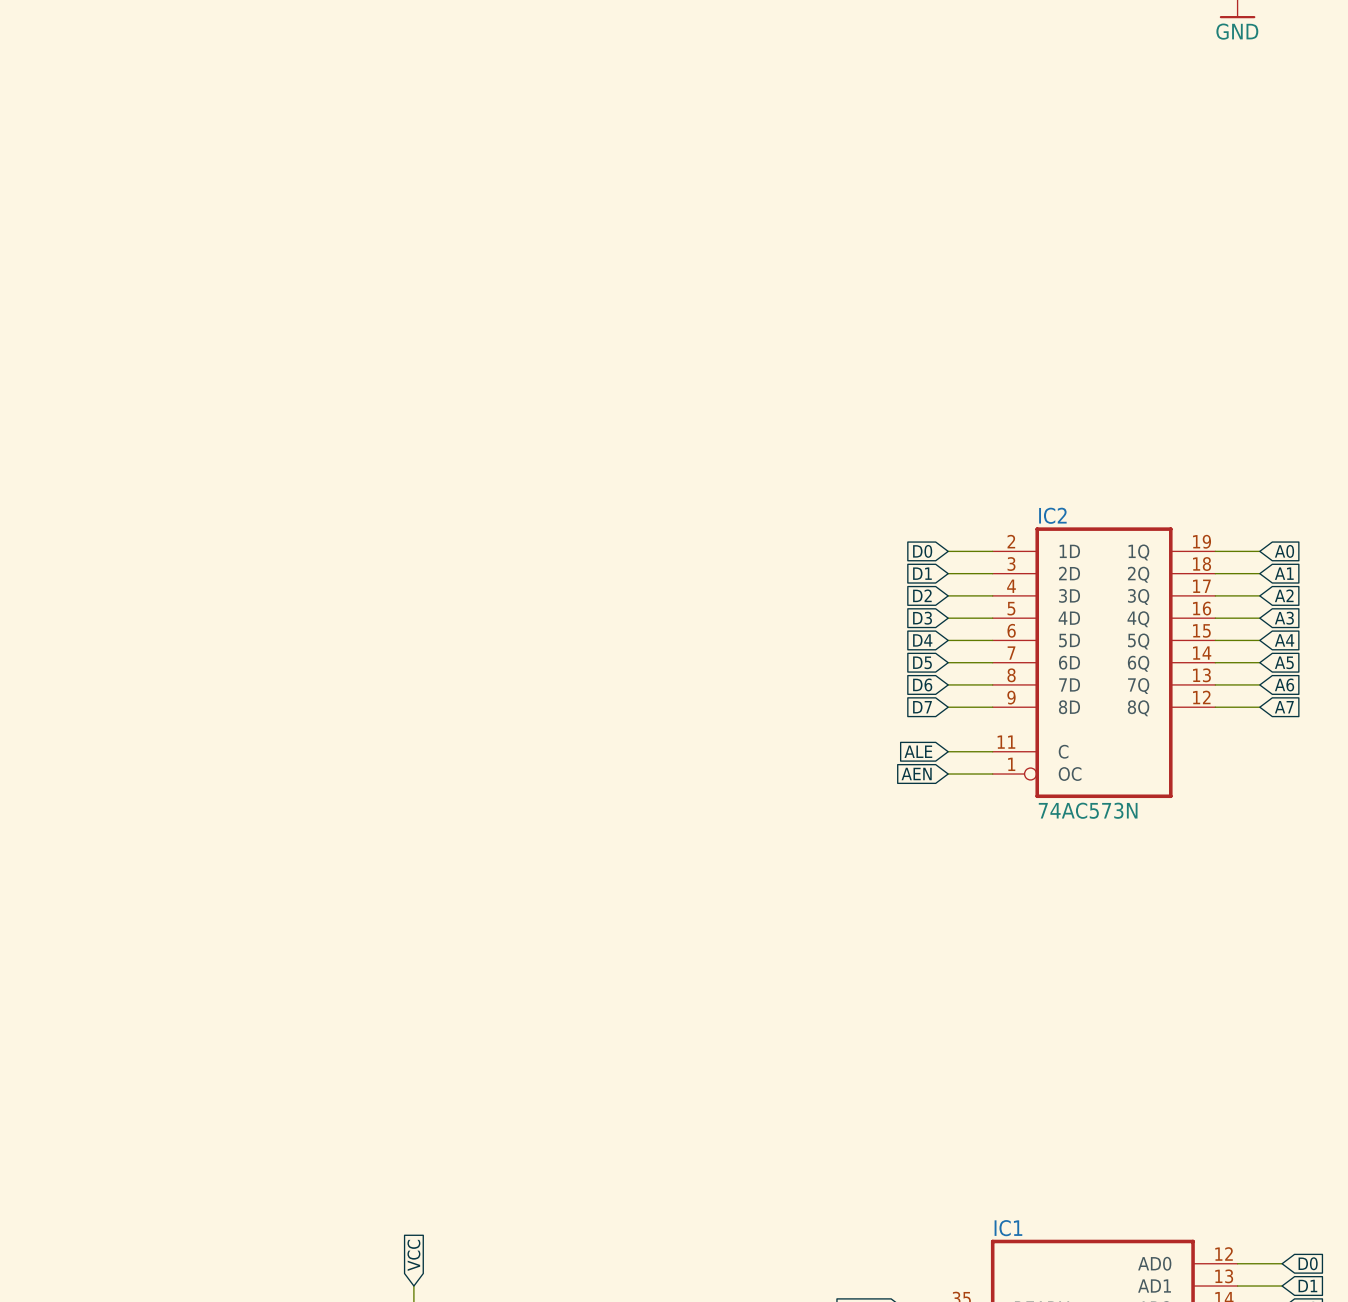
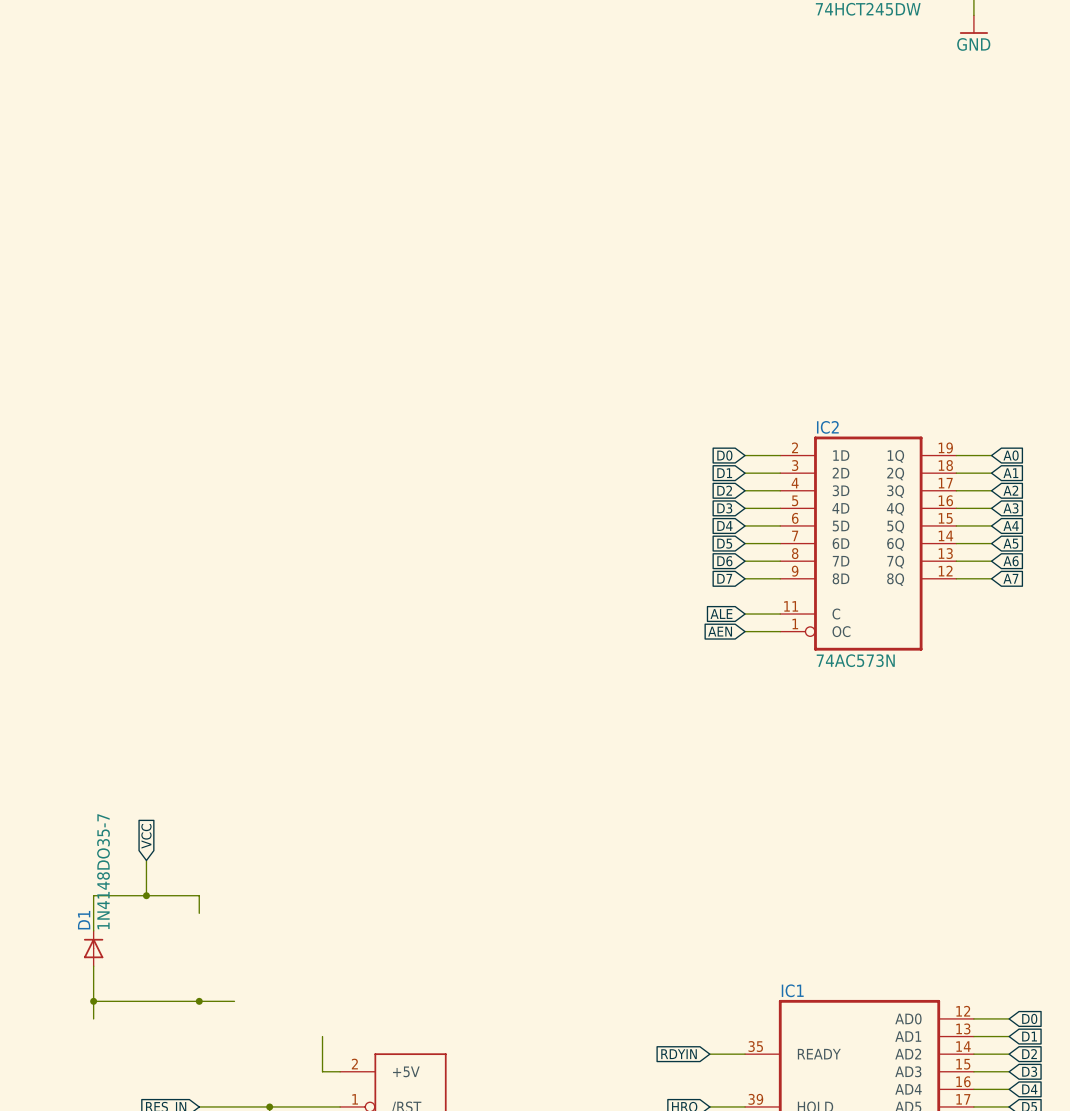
global label: none -> VCC (146, 836)
wire: none -> (146, 860) (146, 895)
junction: none -> (146, 895)
wire: none -> (199, 913) (199, 895) (93, 895) (93, 930)
D1: none -> 1N4148DO35-7 (93, 948)
wire: none -> (93, 966) (93, 1018)
wire: none -> (93, 1001) (234, 1001)
junction: none -> (93, 1001)
junction: none -> (199, 1001)
global label: VCC (413, 1255) -> none

